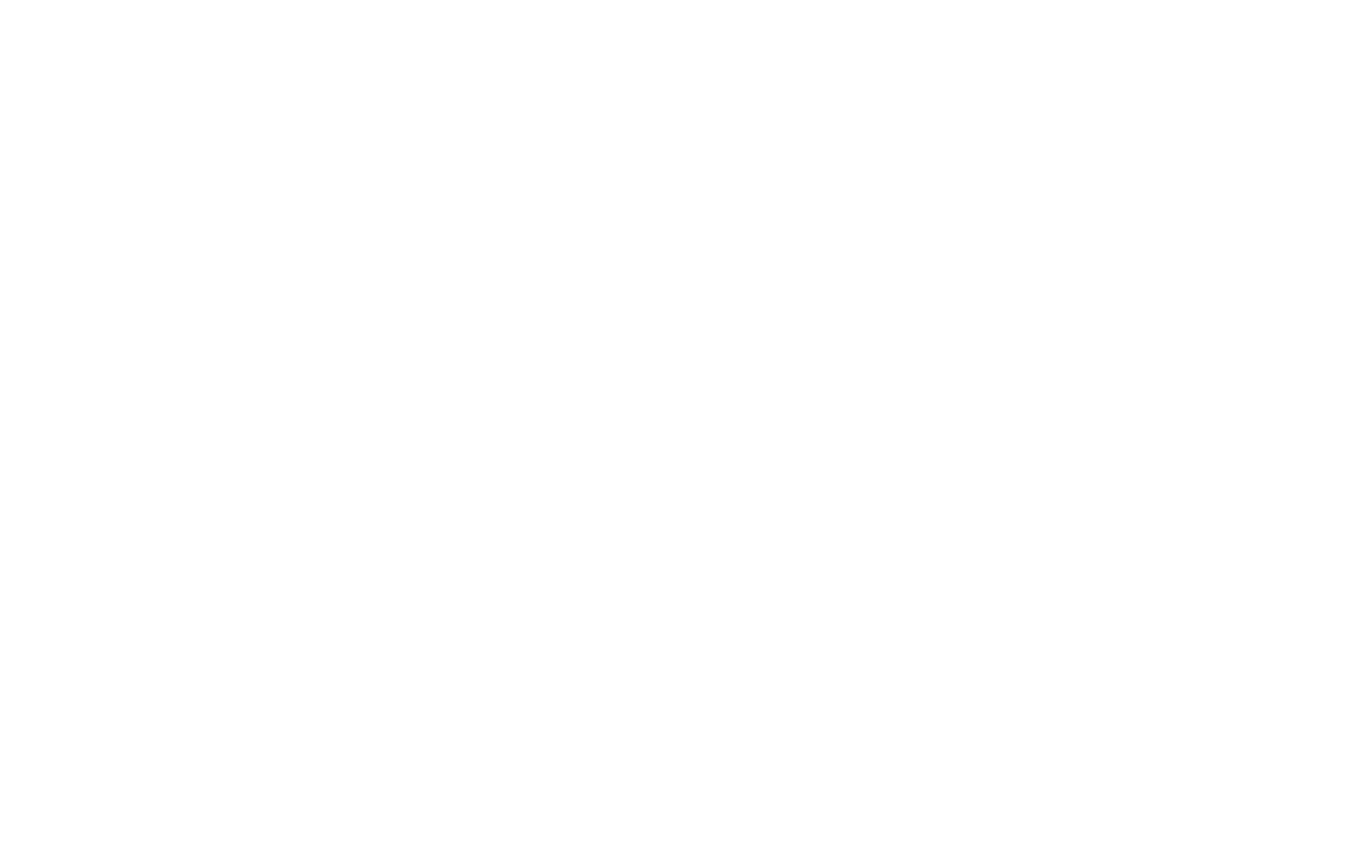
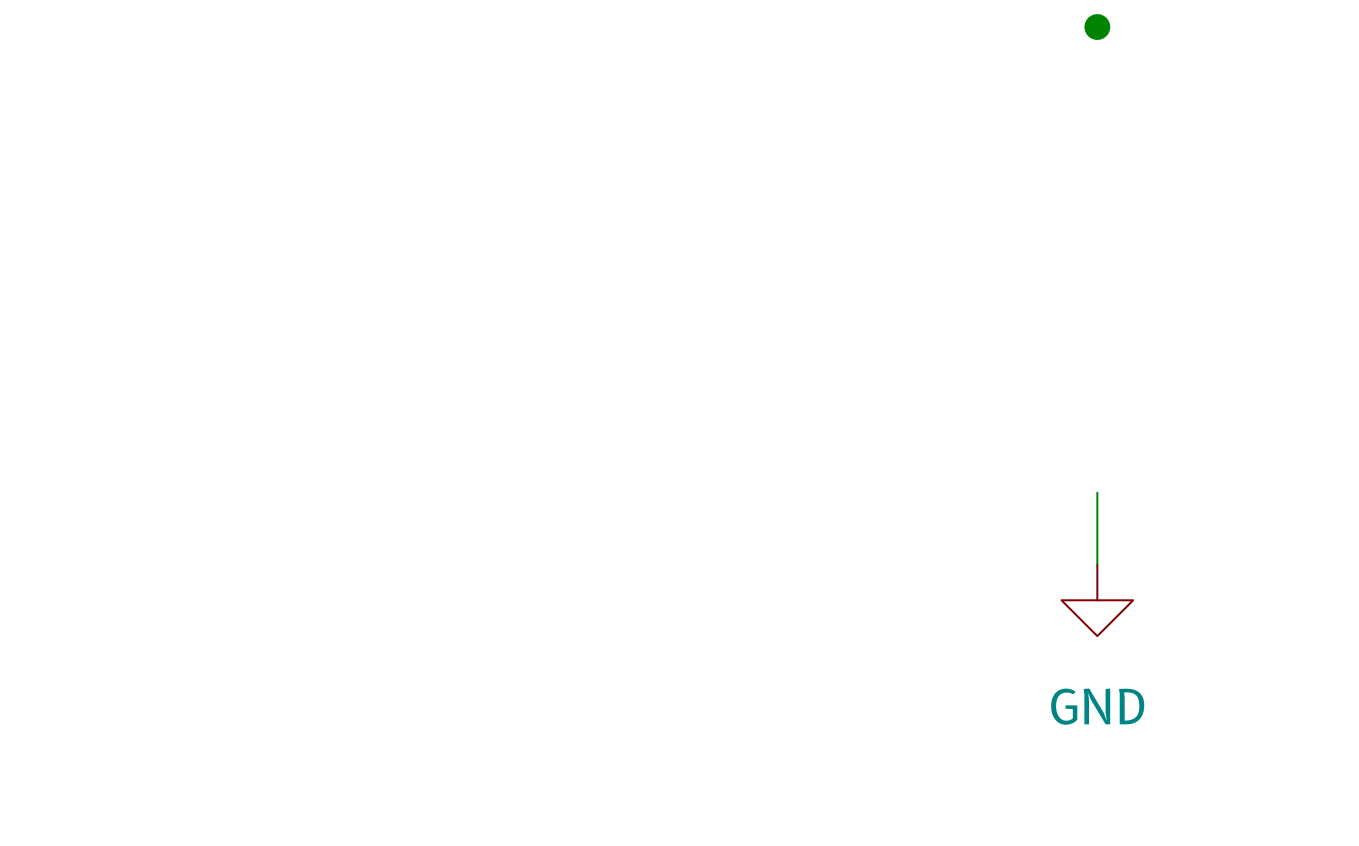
junction: none -> (1097, 27)
wire: none -> (1097, 492) (1097, 564)
power symbol: none -> GND (1097, 600)

